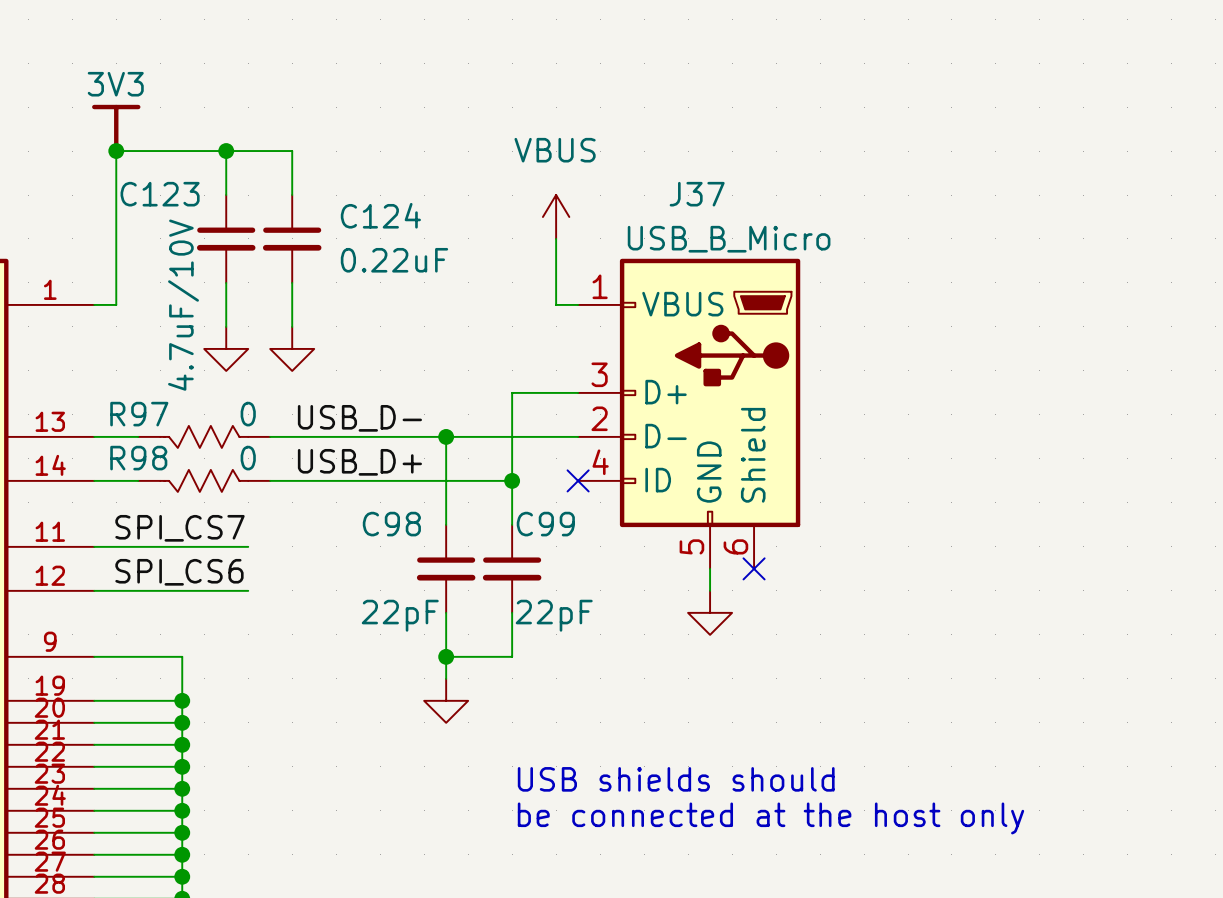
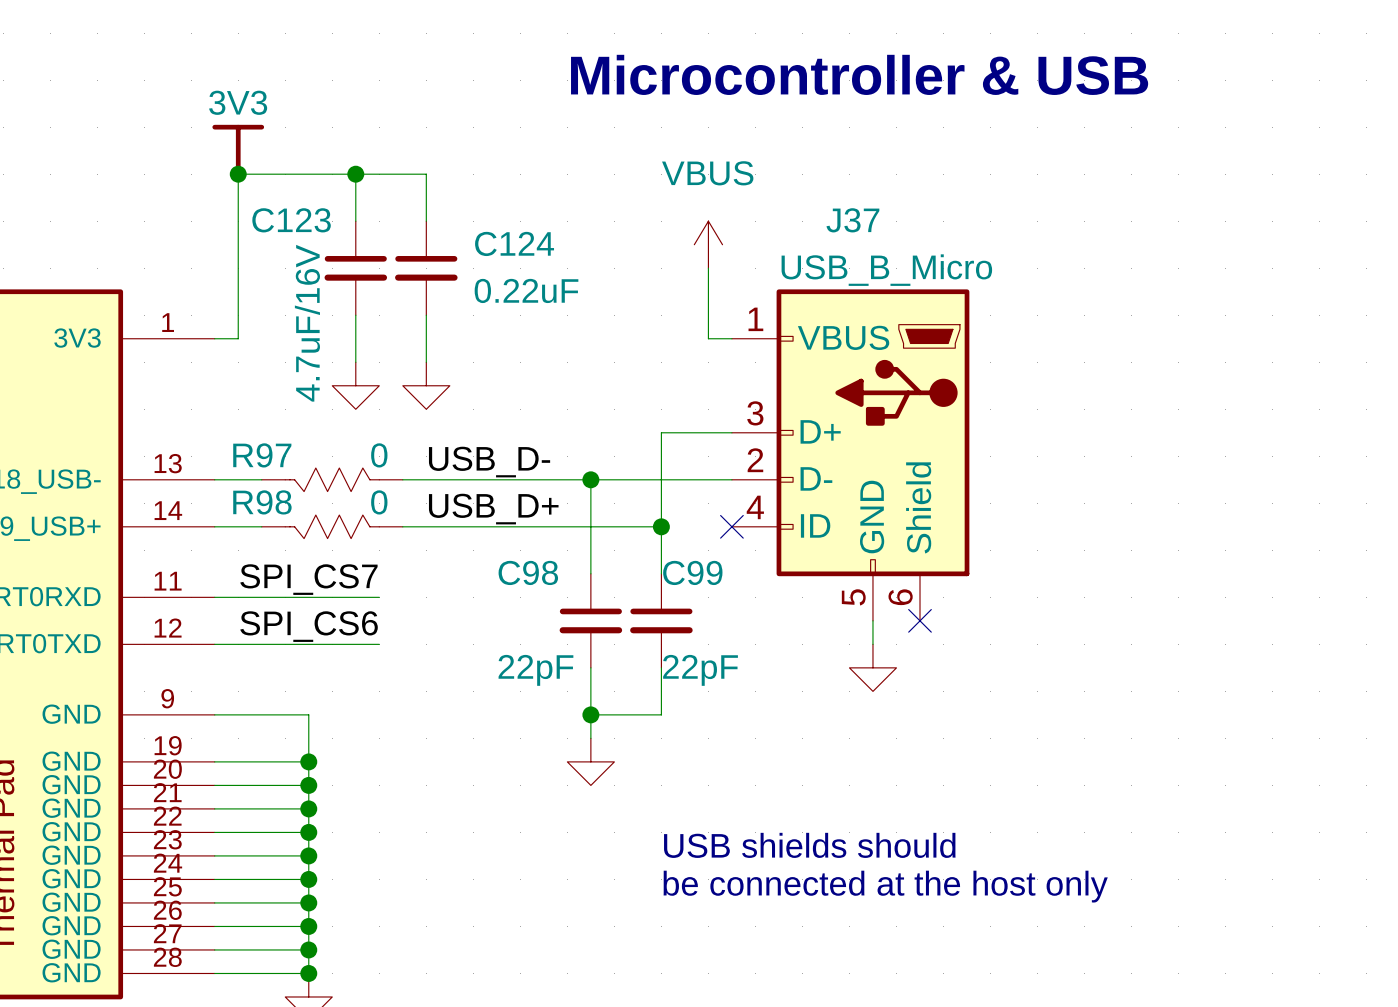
text: none -> Microcontroller & USB (859, 74)
C123 value: 4.7uF/10V (183, 305) -> 4.7uF/16V (307, 323)

